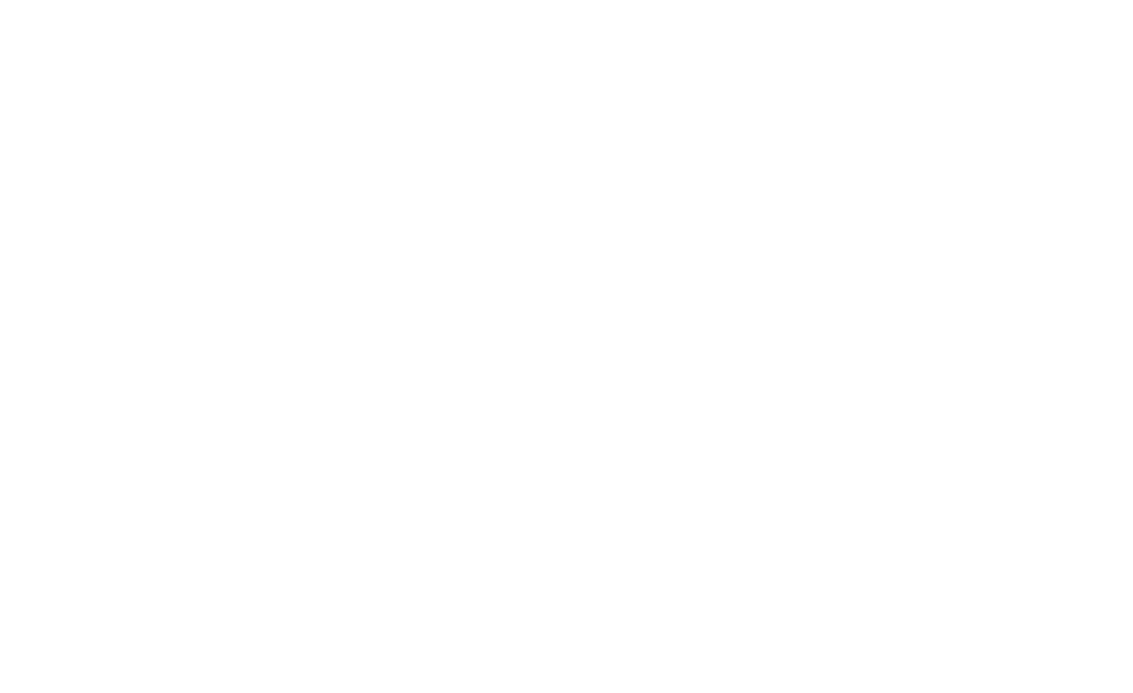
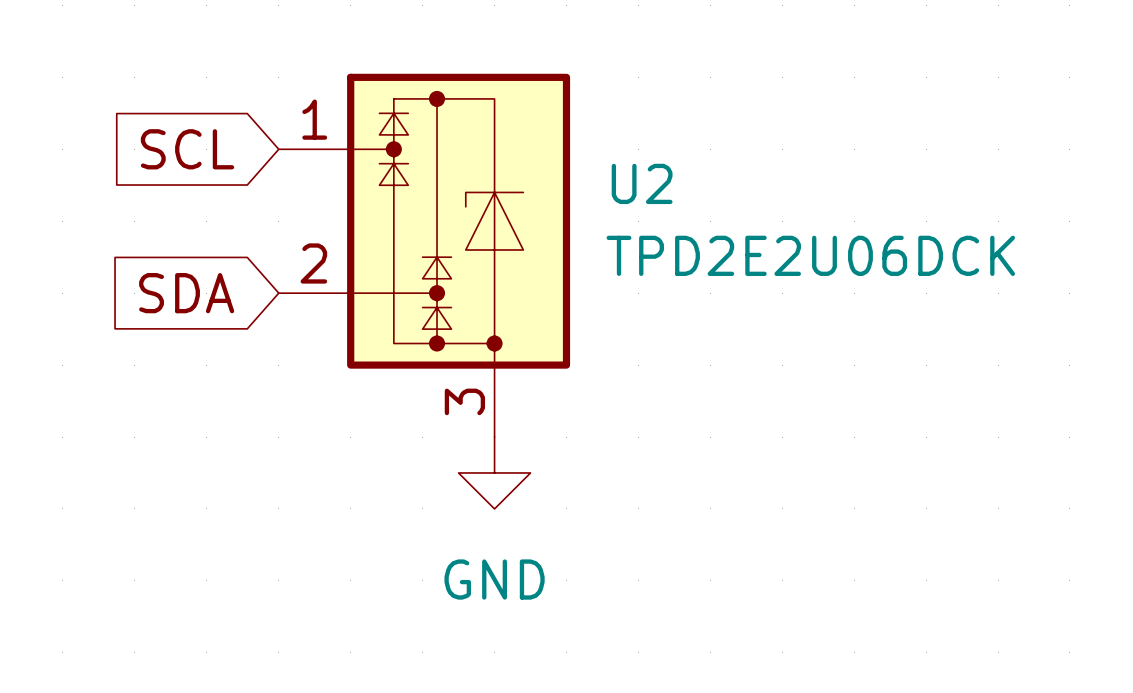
global label: none -> SCL (187, 149)
U2: none -> TPD2E2U06DCK (424, 255)
global label: none -> SDA (186, 293)
power symbol: none -> GND (494, 472)

